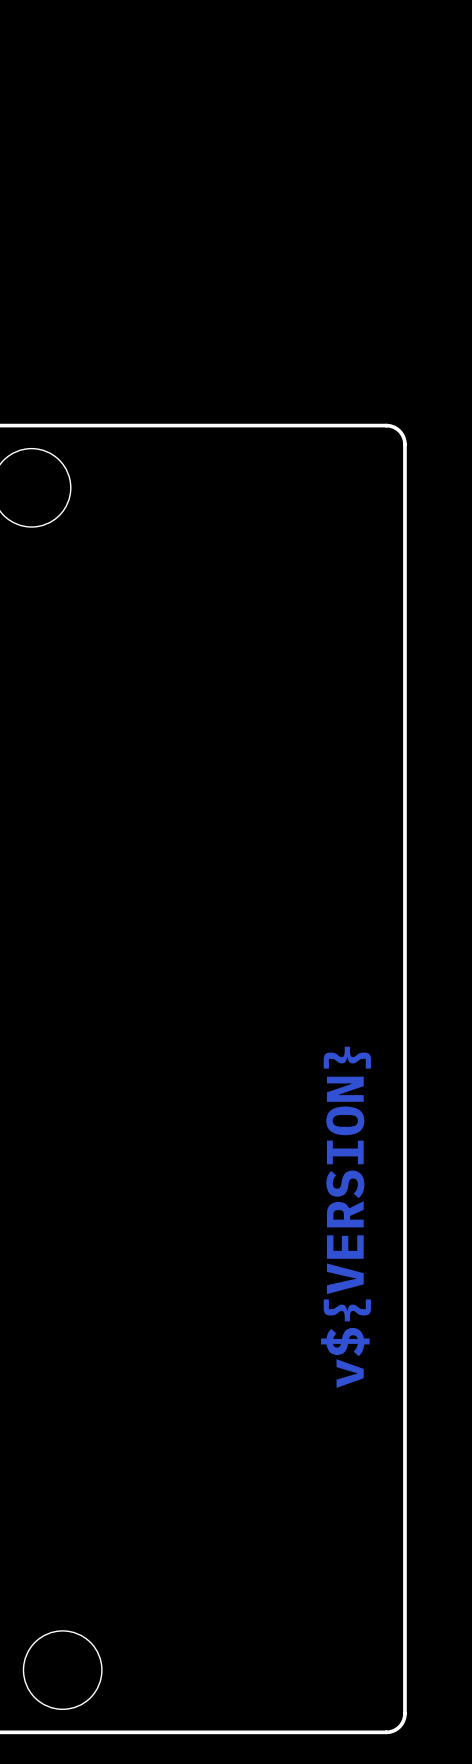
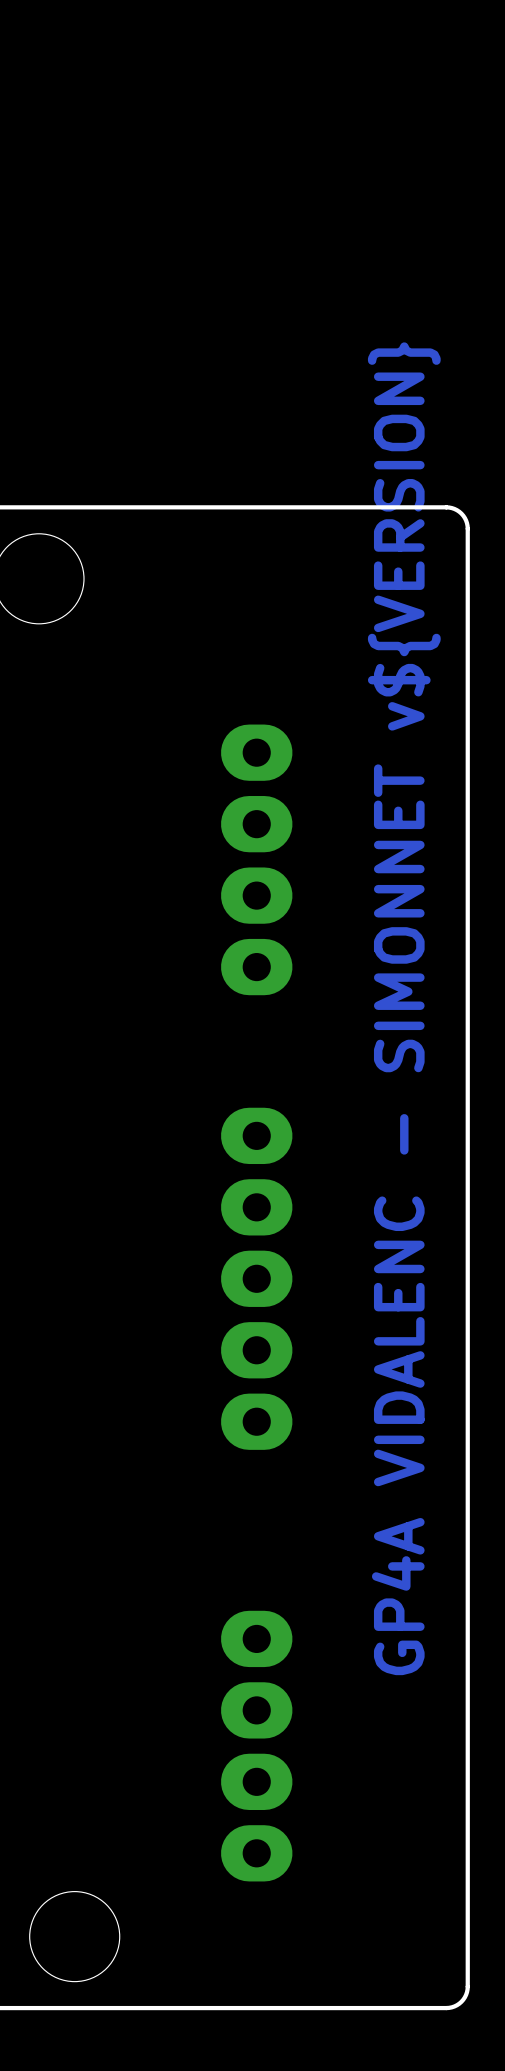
part: none -> (256, 859)
text: none -> GP4A VIDALENC - SIMONNET v${VERSION} (404, 1008)
part: none -> (256, 1278)
text: v${VERSION} (345, 1217) -> none
part: none -> (256, 1746)

